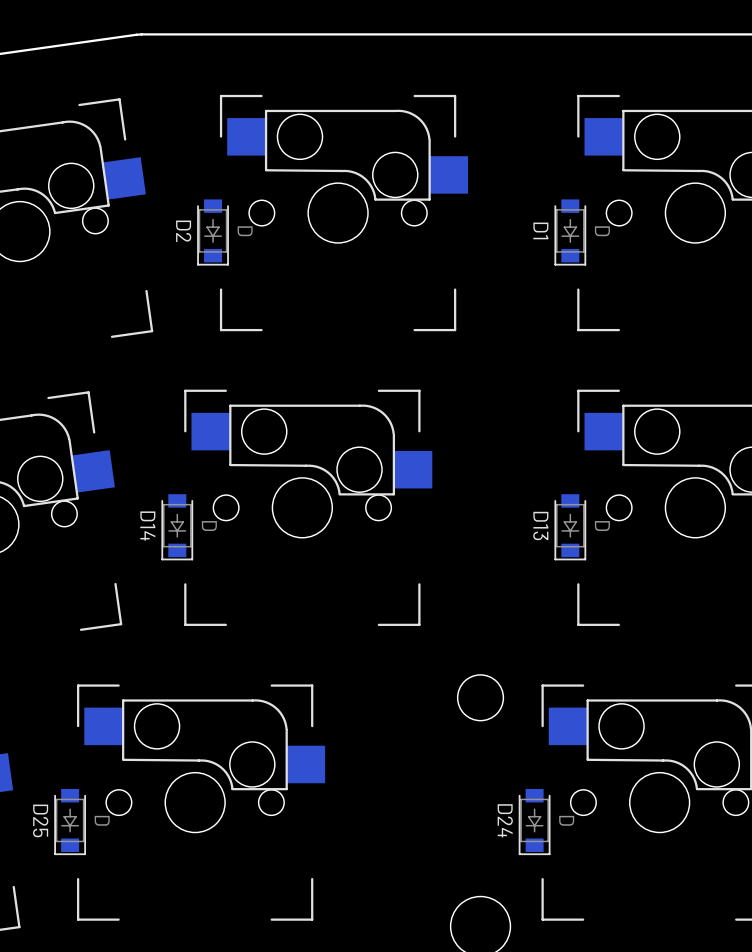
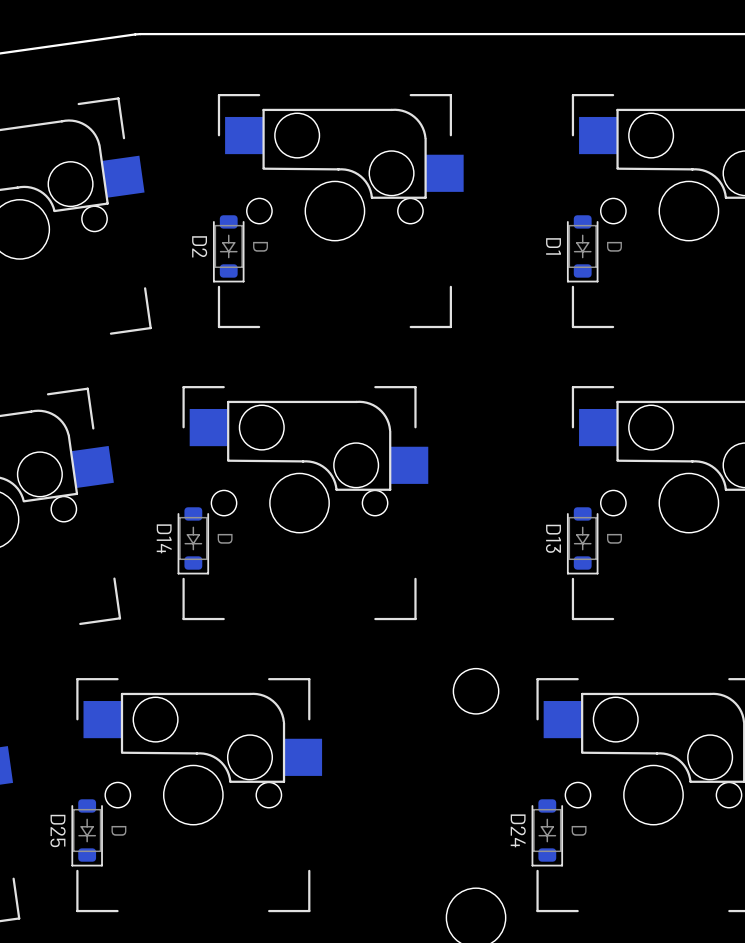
D2 footprint: [197, 199, 229, 266] -> [212, 215, 245, 283]
D1 footprint: [554, 199, 587, 266] -> [566, 215, 599, 283]
D14 footprint: [161, 494, 194, 561] -> [177, 507, 210, 575]
D13 footprint: [554, 494, 587, 561] -> [566, 507, 599, 575]
D25 footprint: [54, 788, 87, 856] -> [71, 799, 103, 867]
D24 footprint: [518, 788, 551, 856] -> [531, 799, 564, 867]

